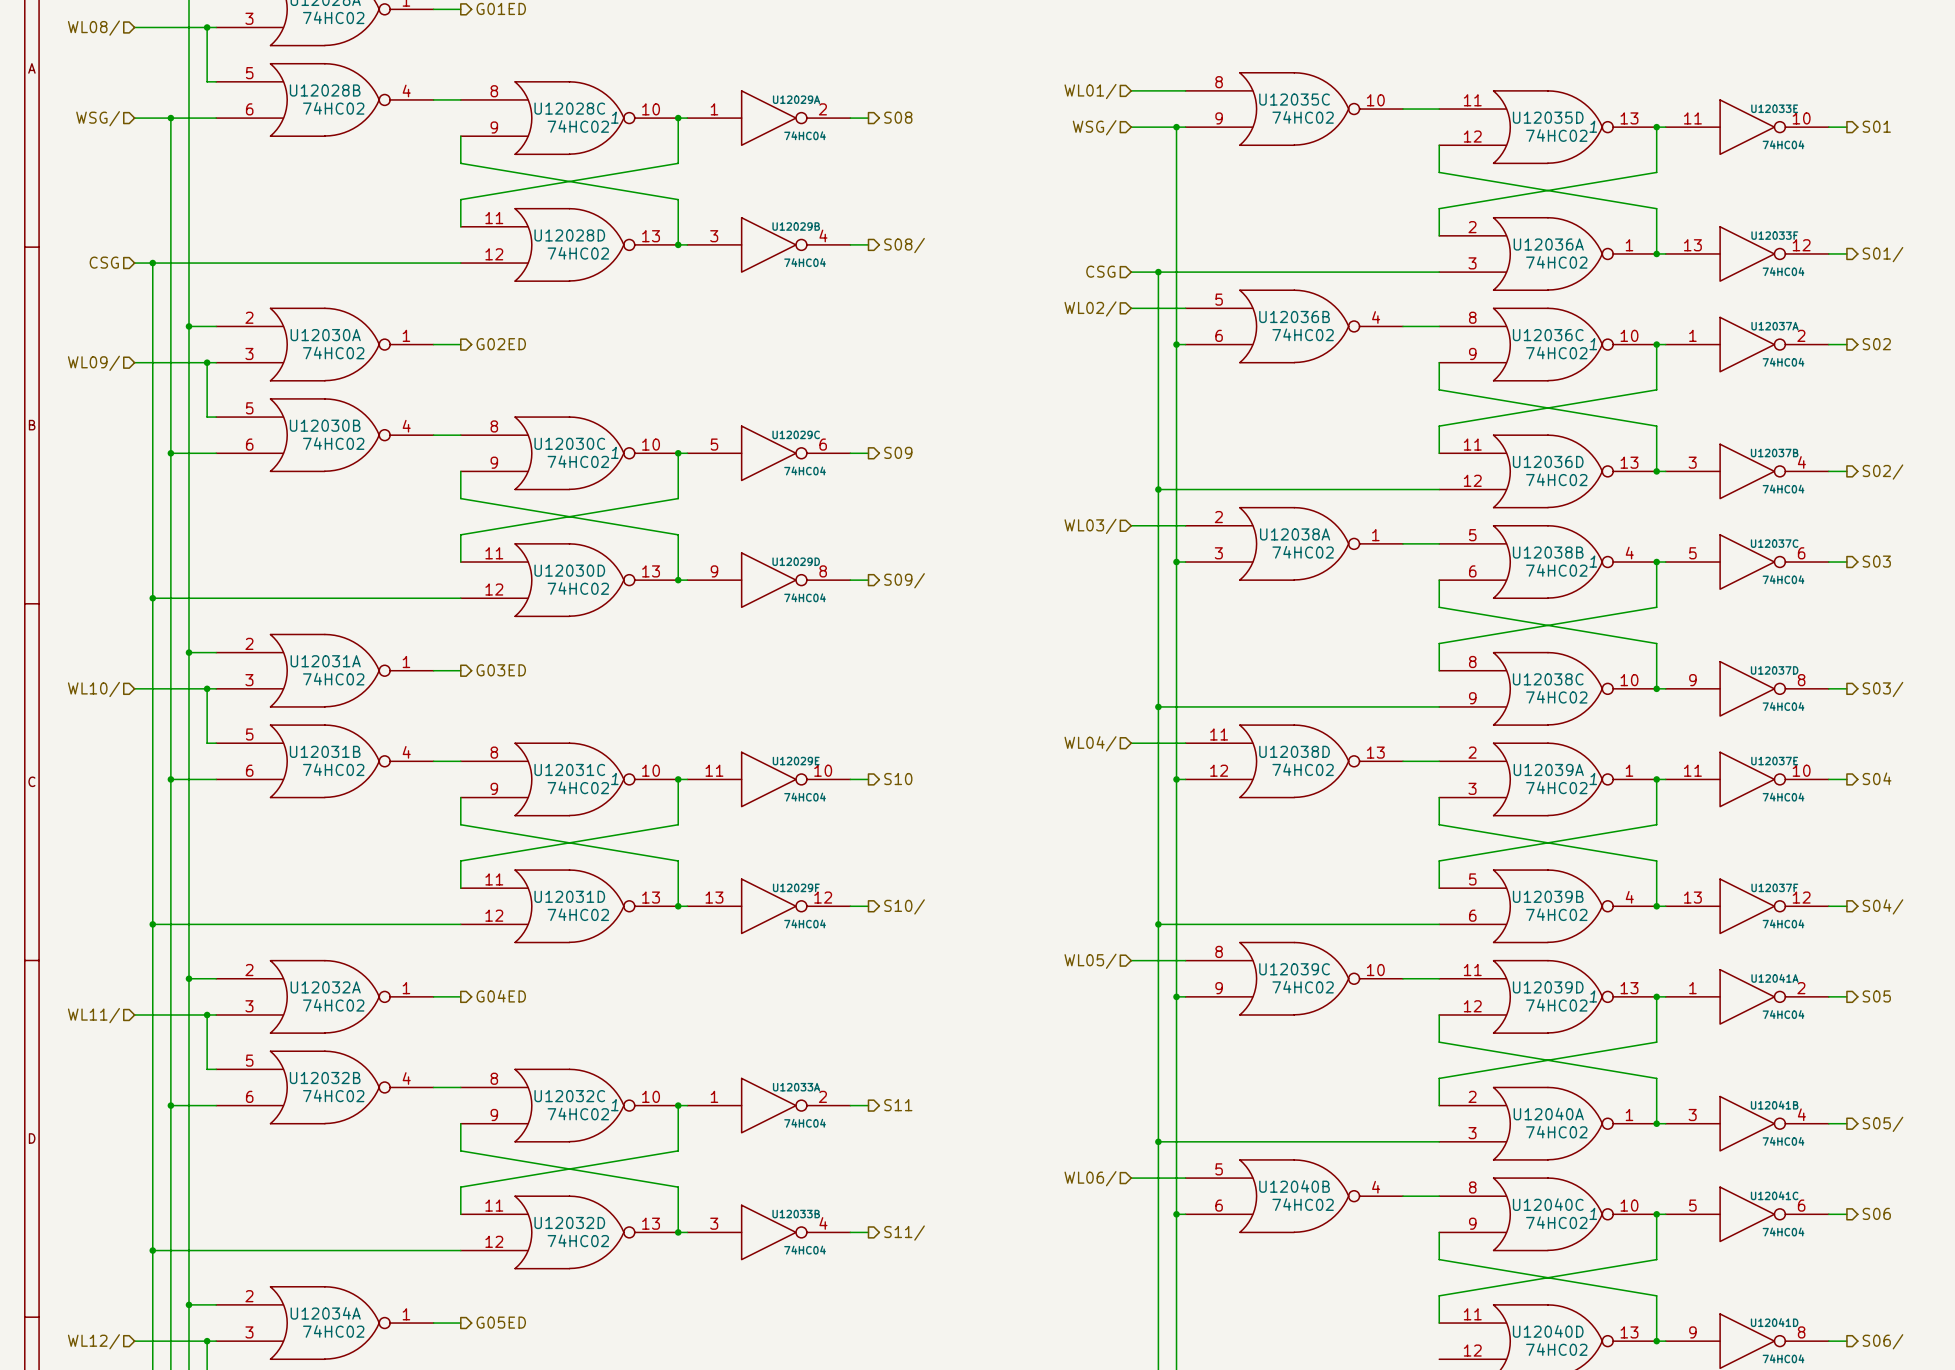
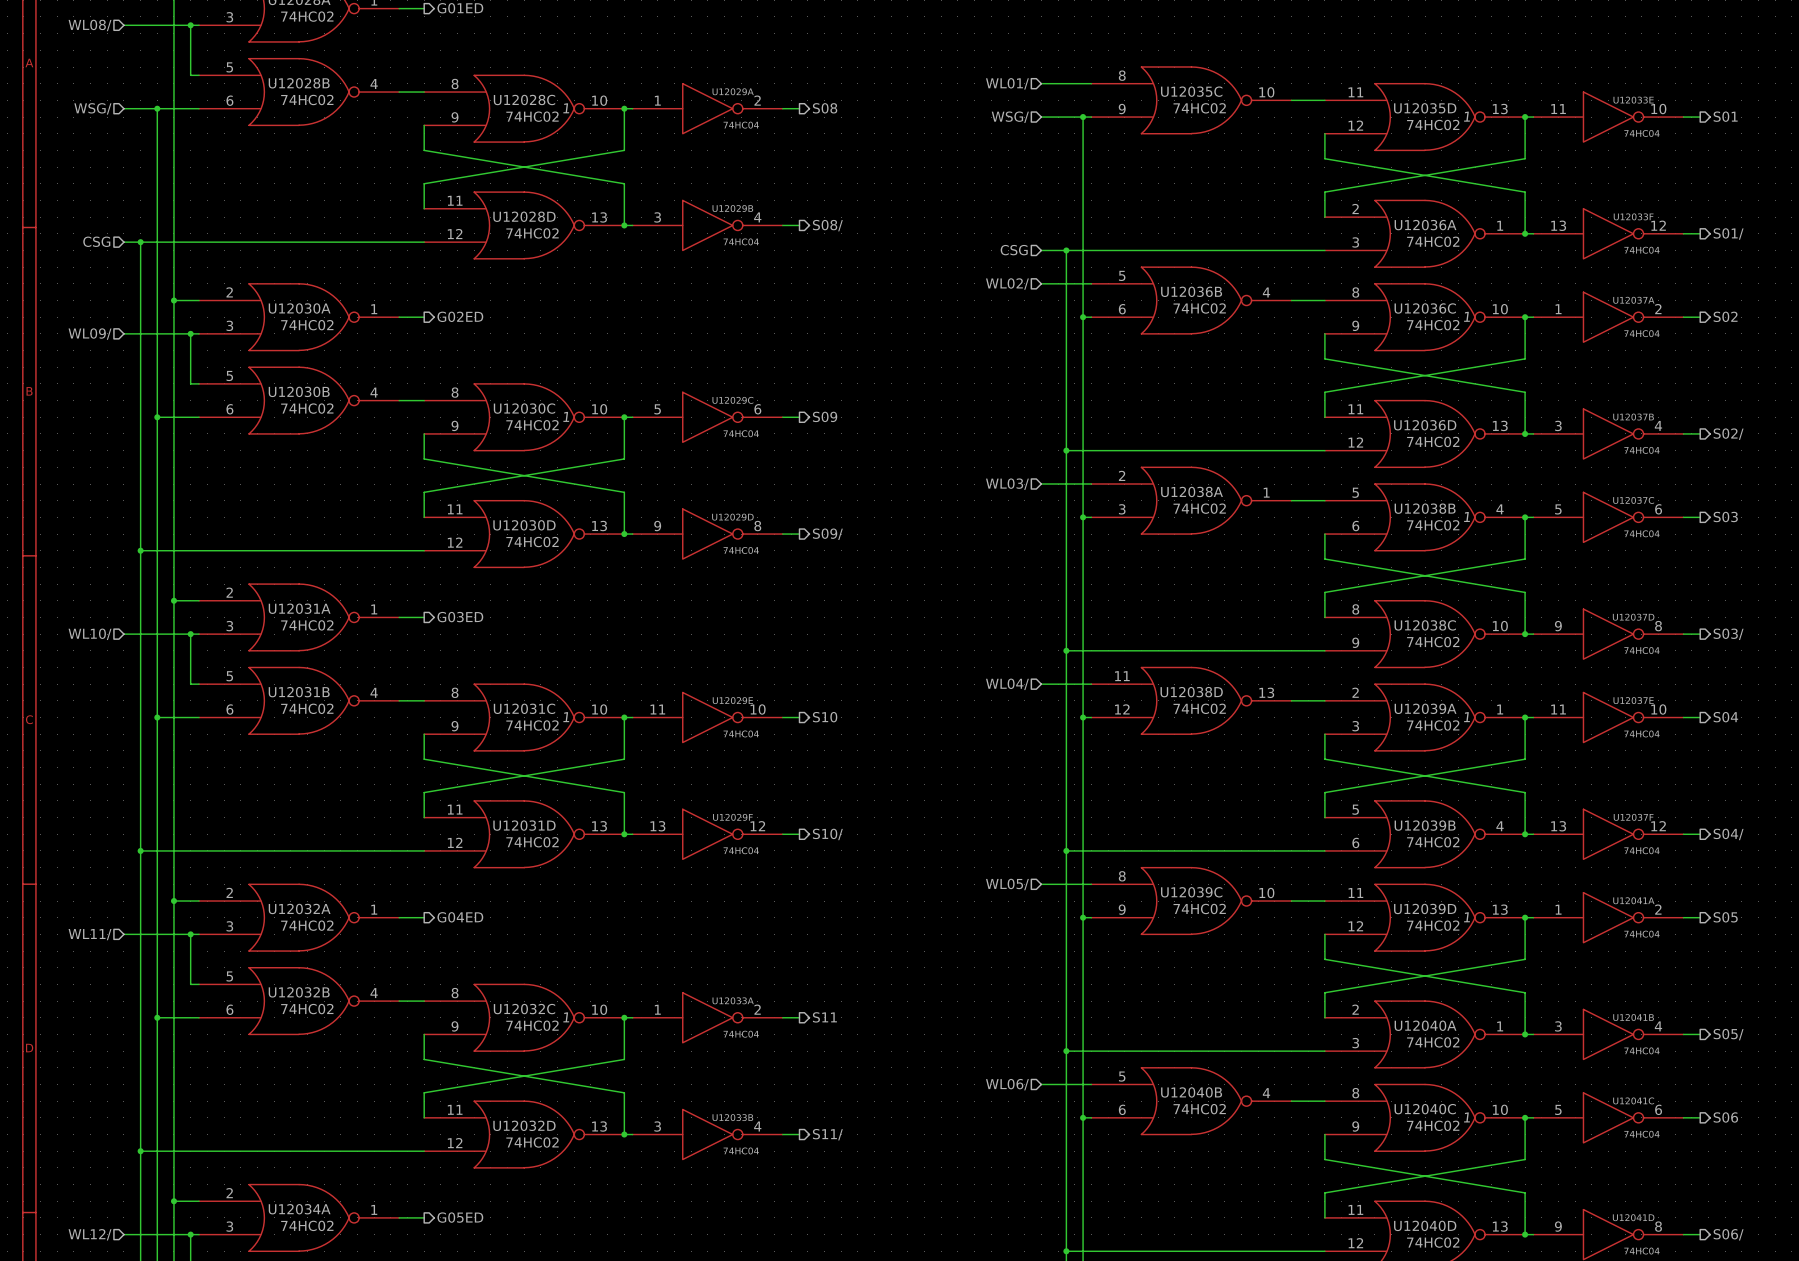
wire: none -> (1066, 1251) (1324, 1251)
junction: none -> (1066, 1251)

